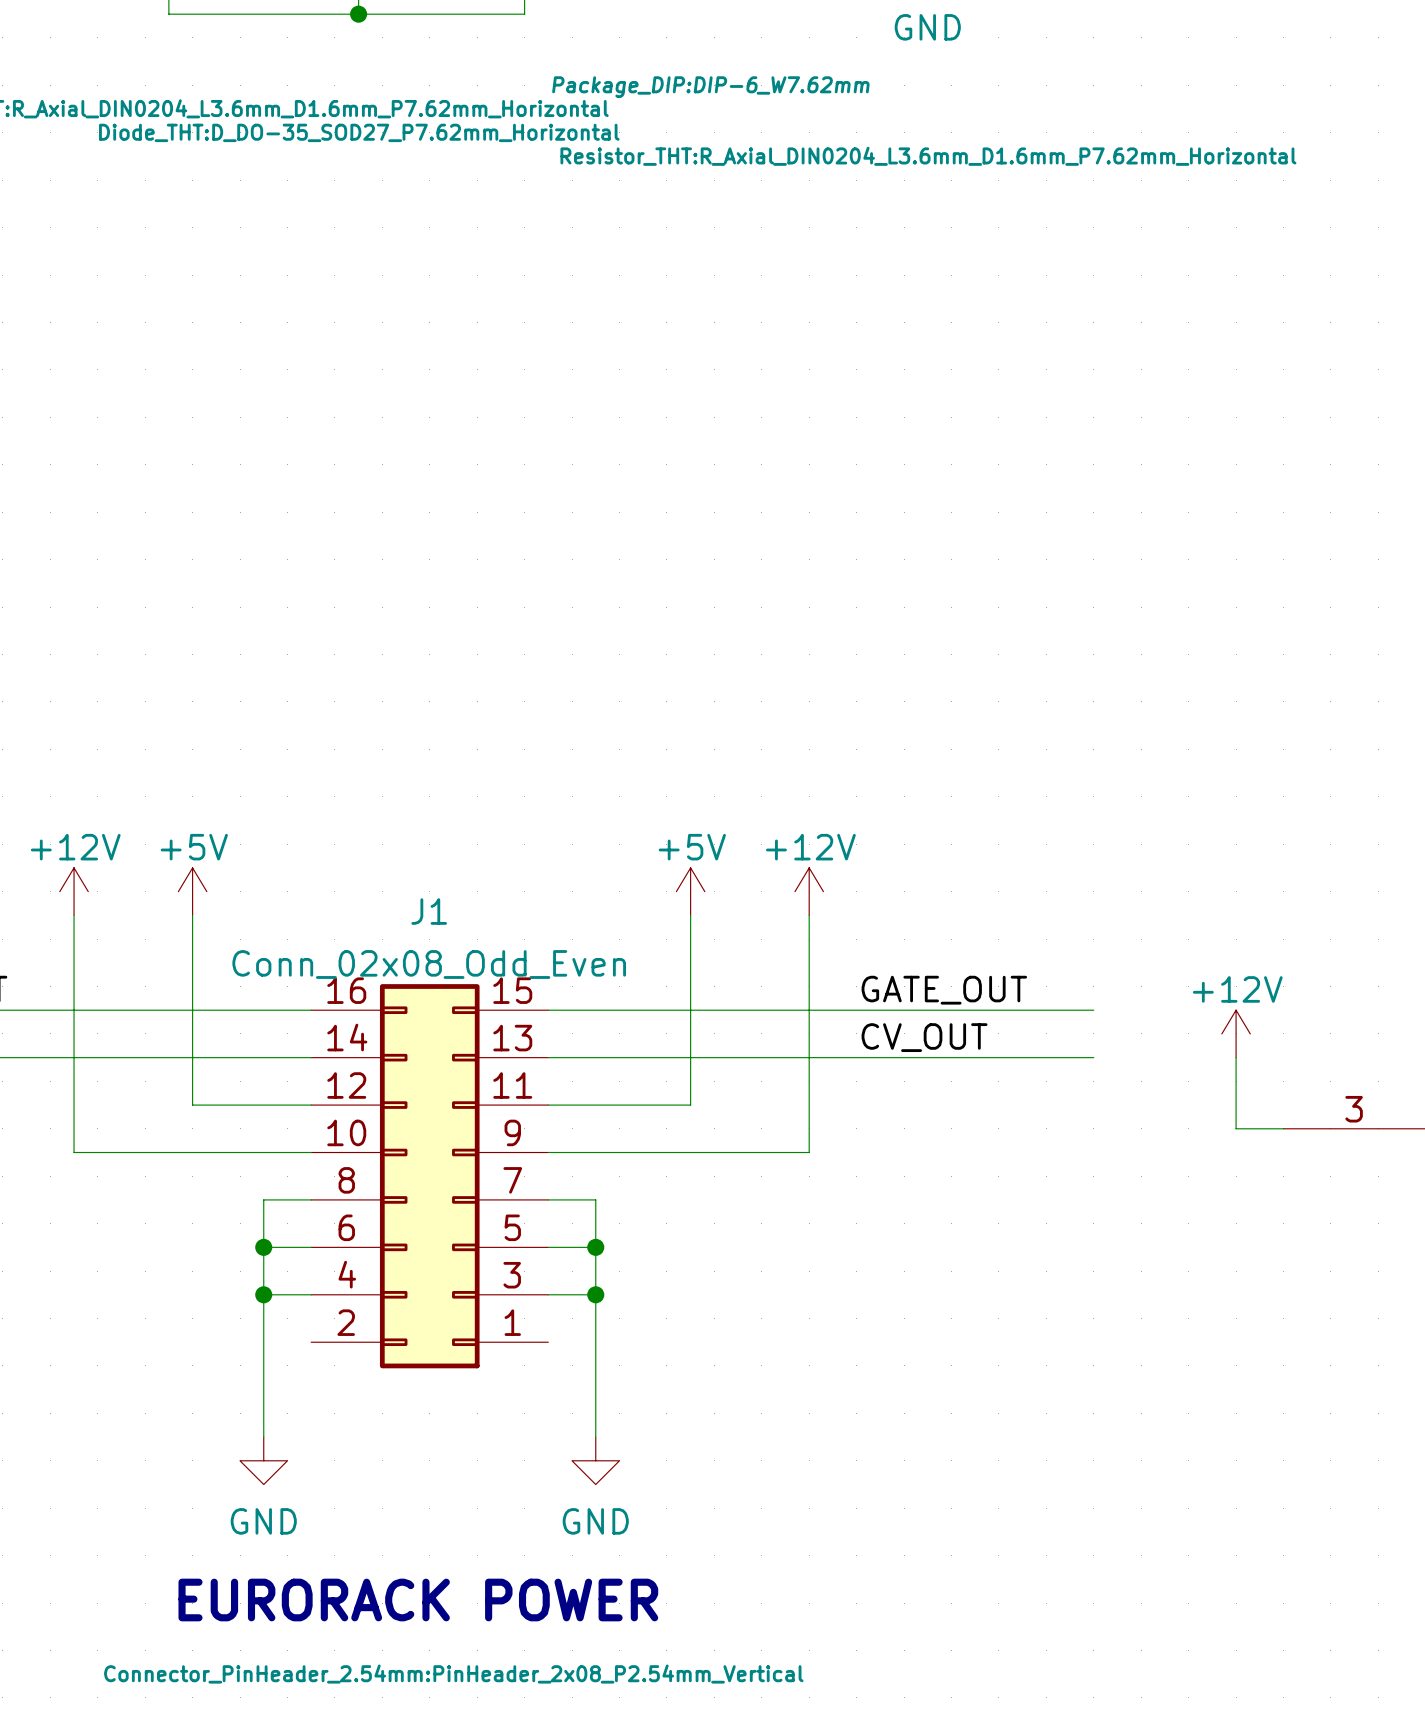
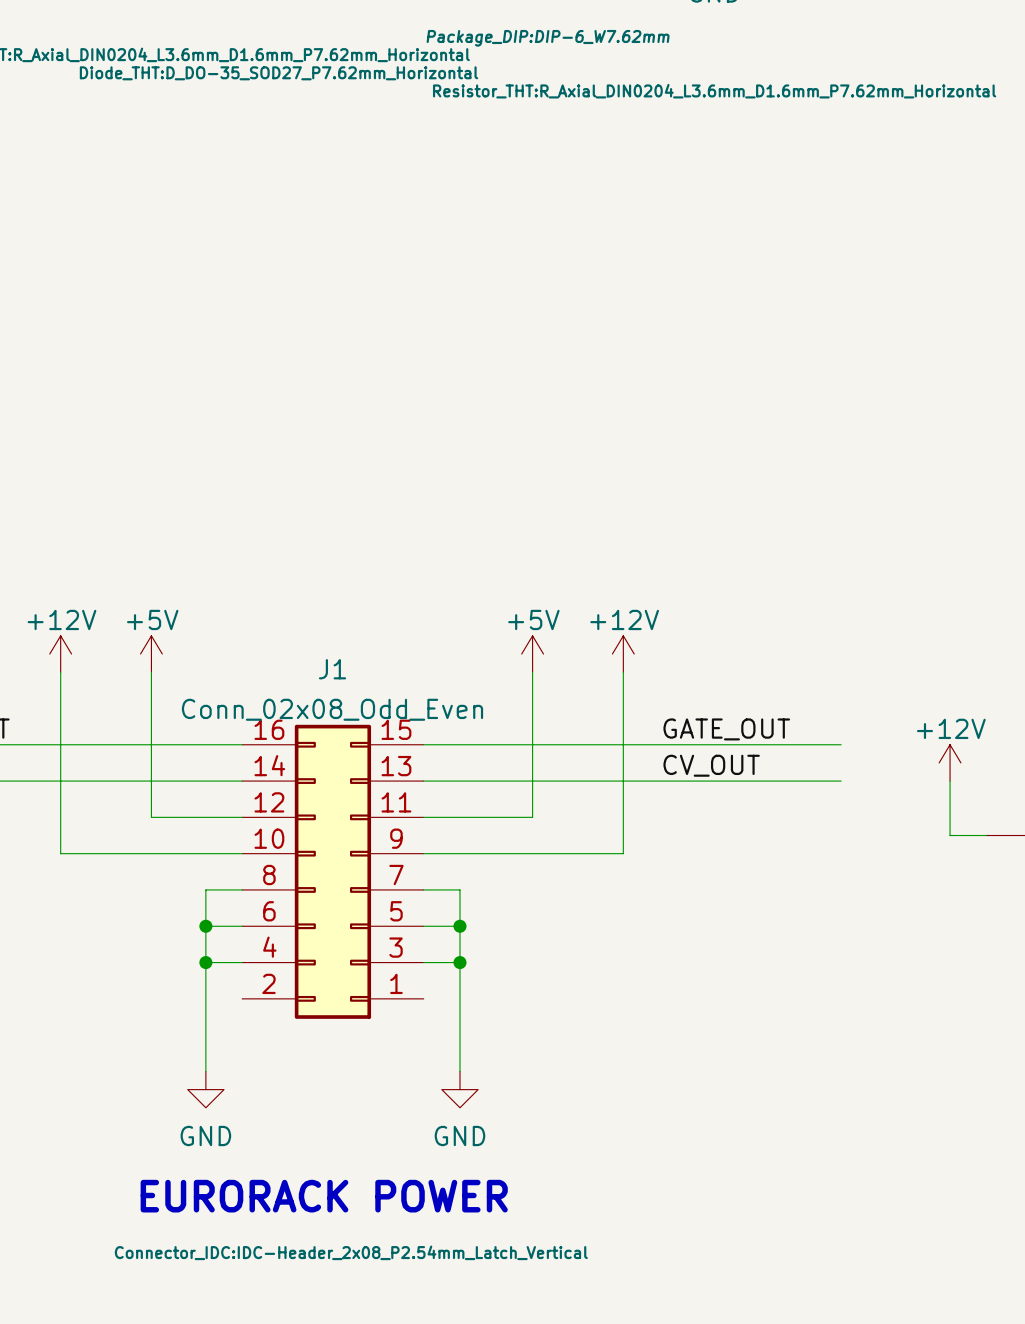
J1 text: Connector_PinHeader_2.54mm:PinHeader_2x08_P2.54mm_Vertical (453, 1674) -> Connector_IDC:IDC-Header_2x08_P2.54mm_Latch_Vertical (351, 1252)

